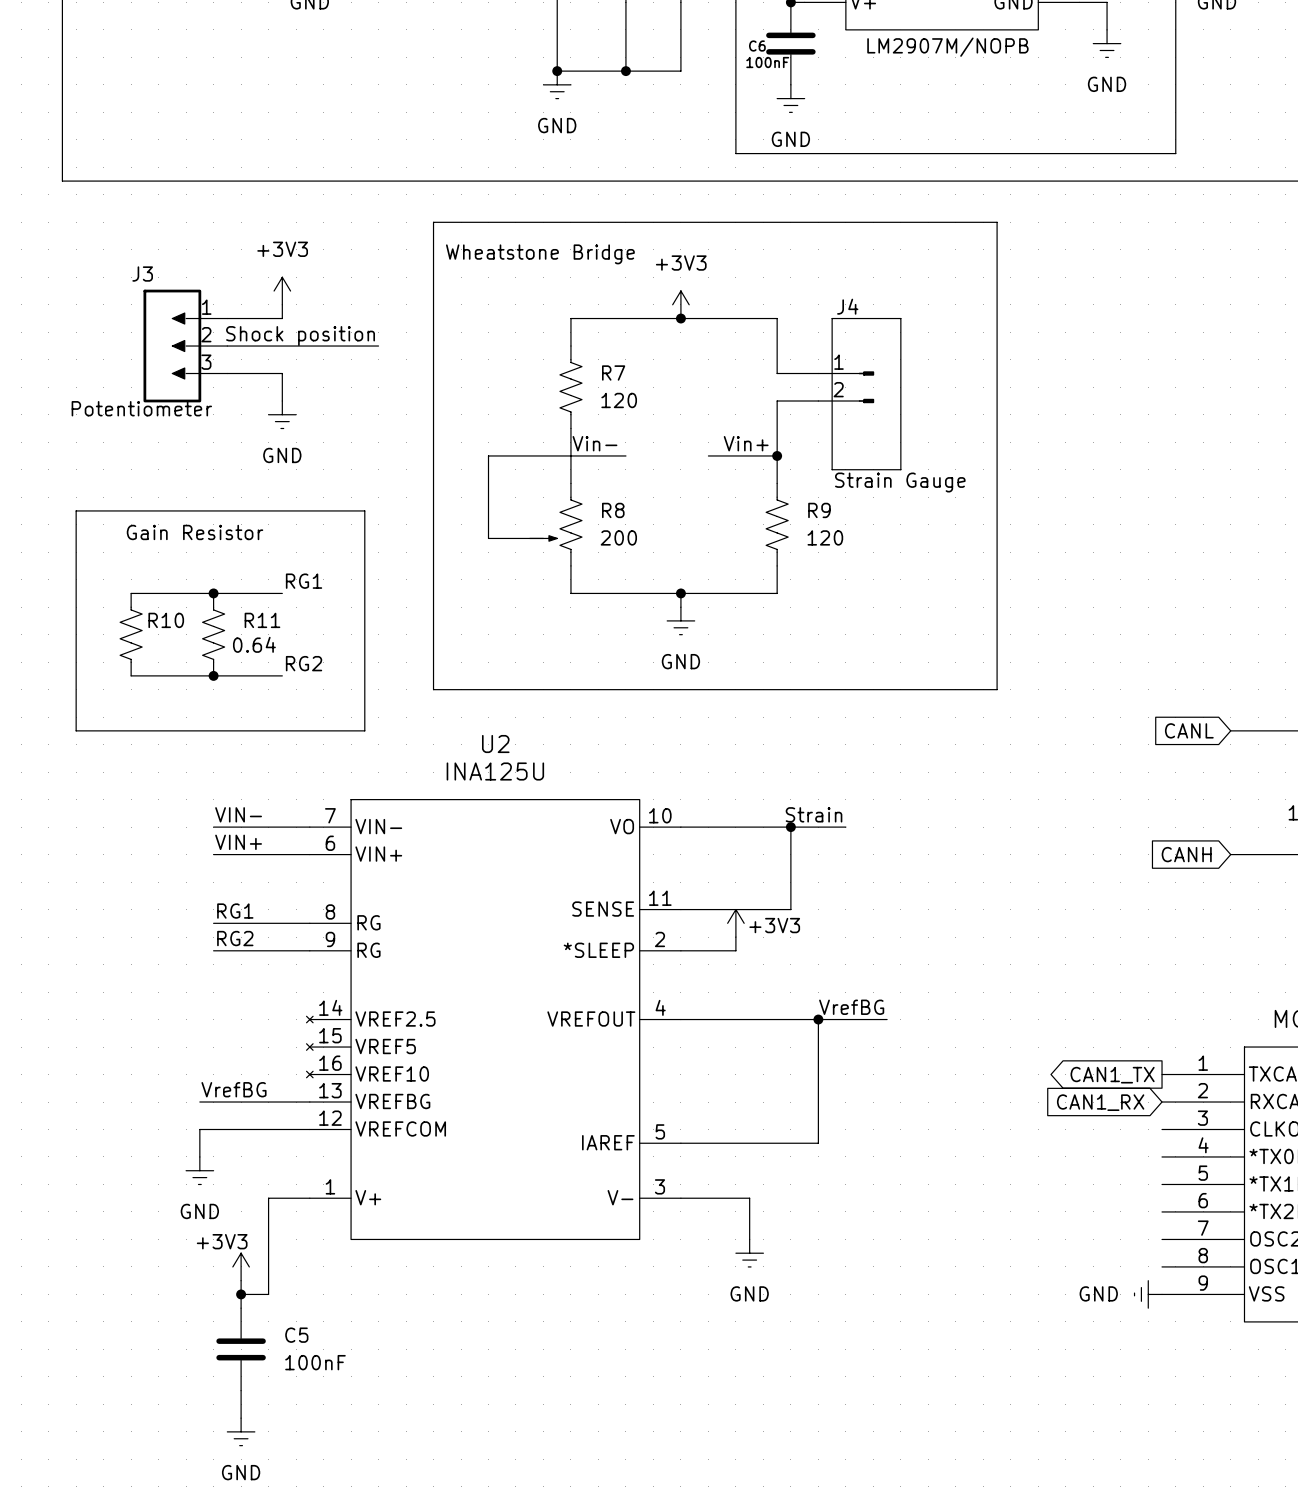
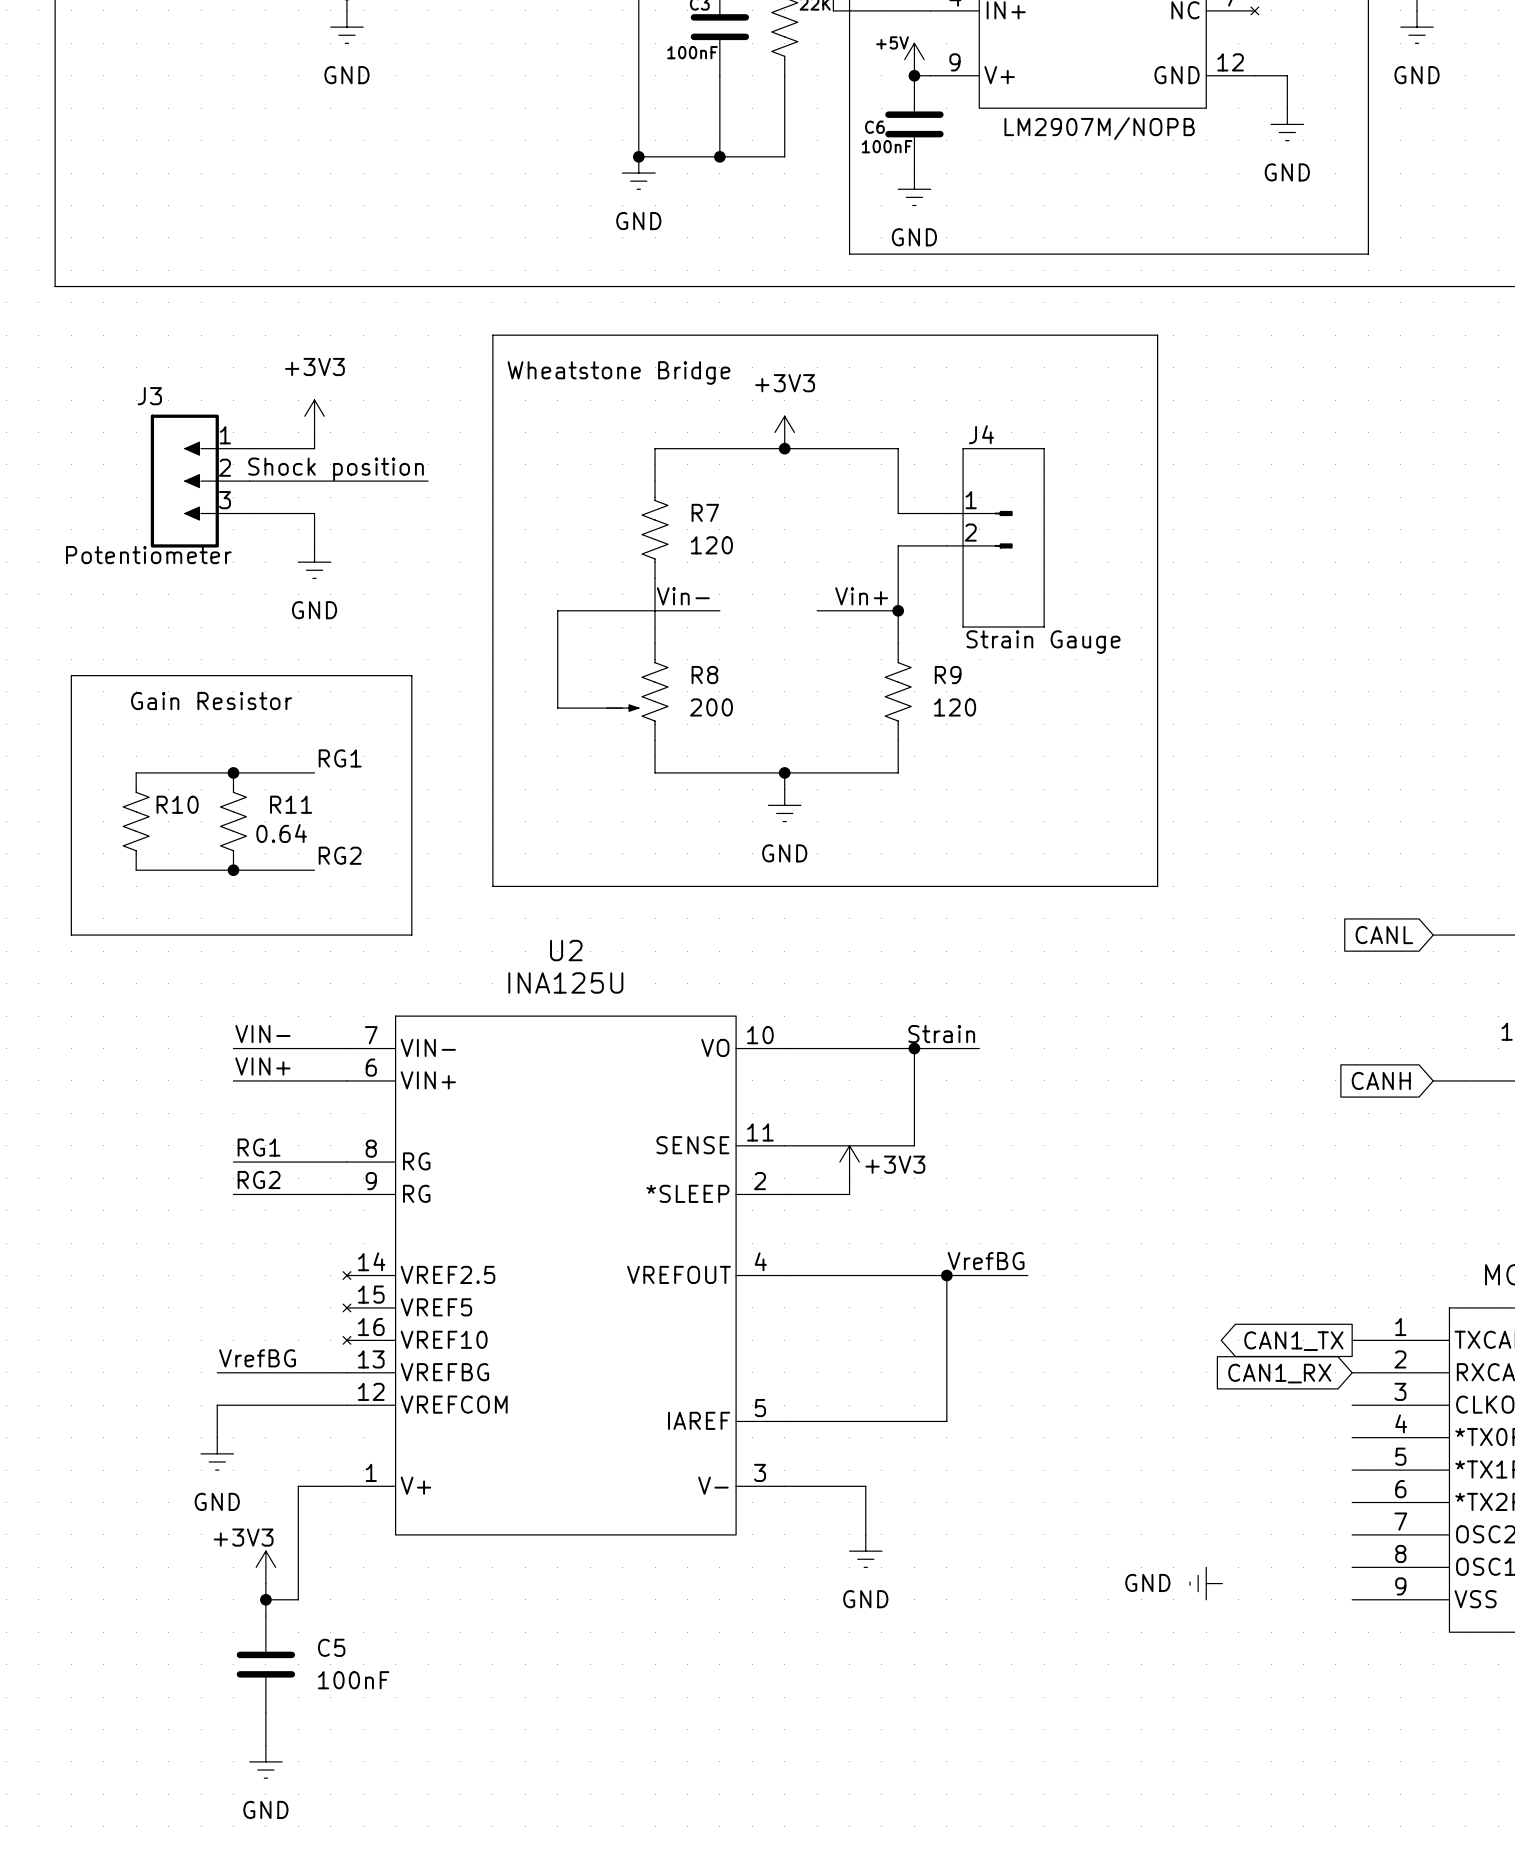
power symbol position: GND (1148, 1294) -> GND (1206, 1583)

